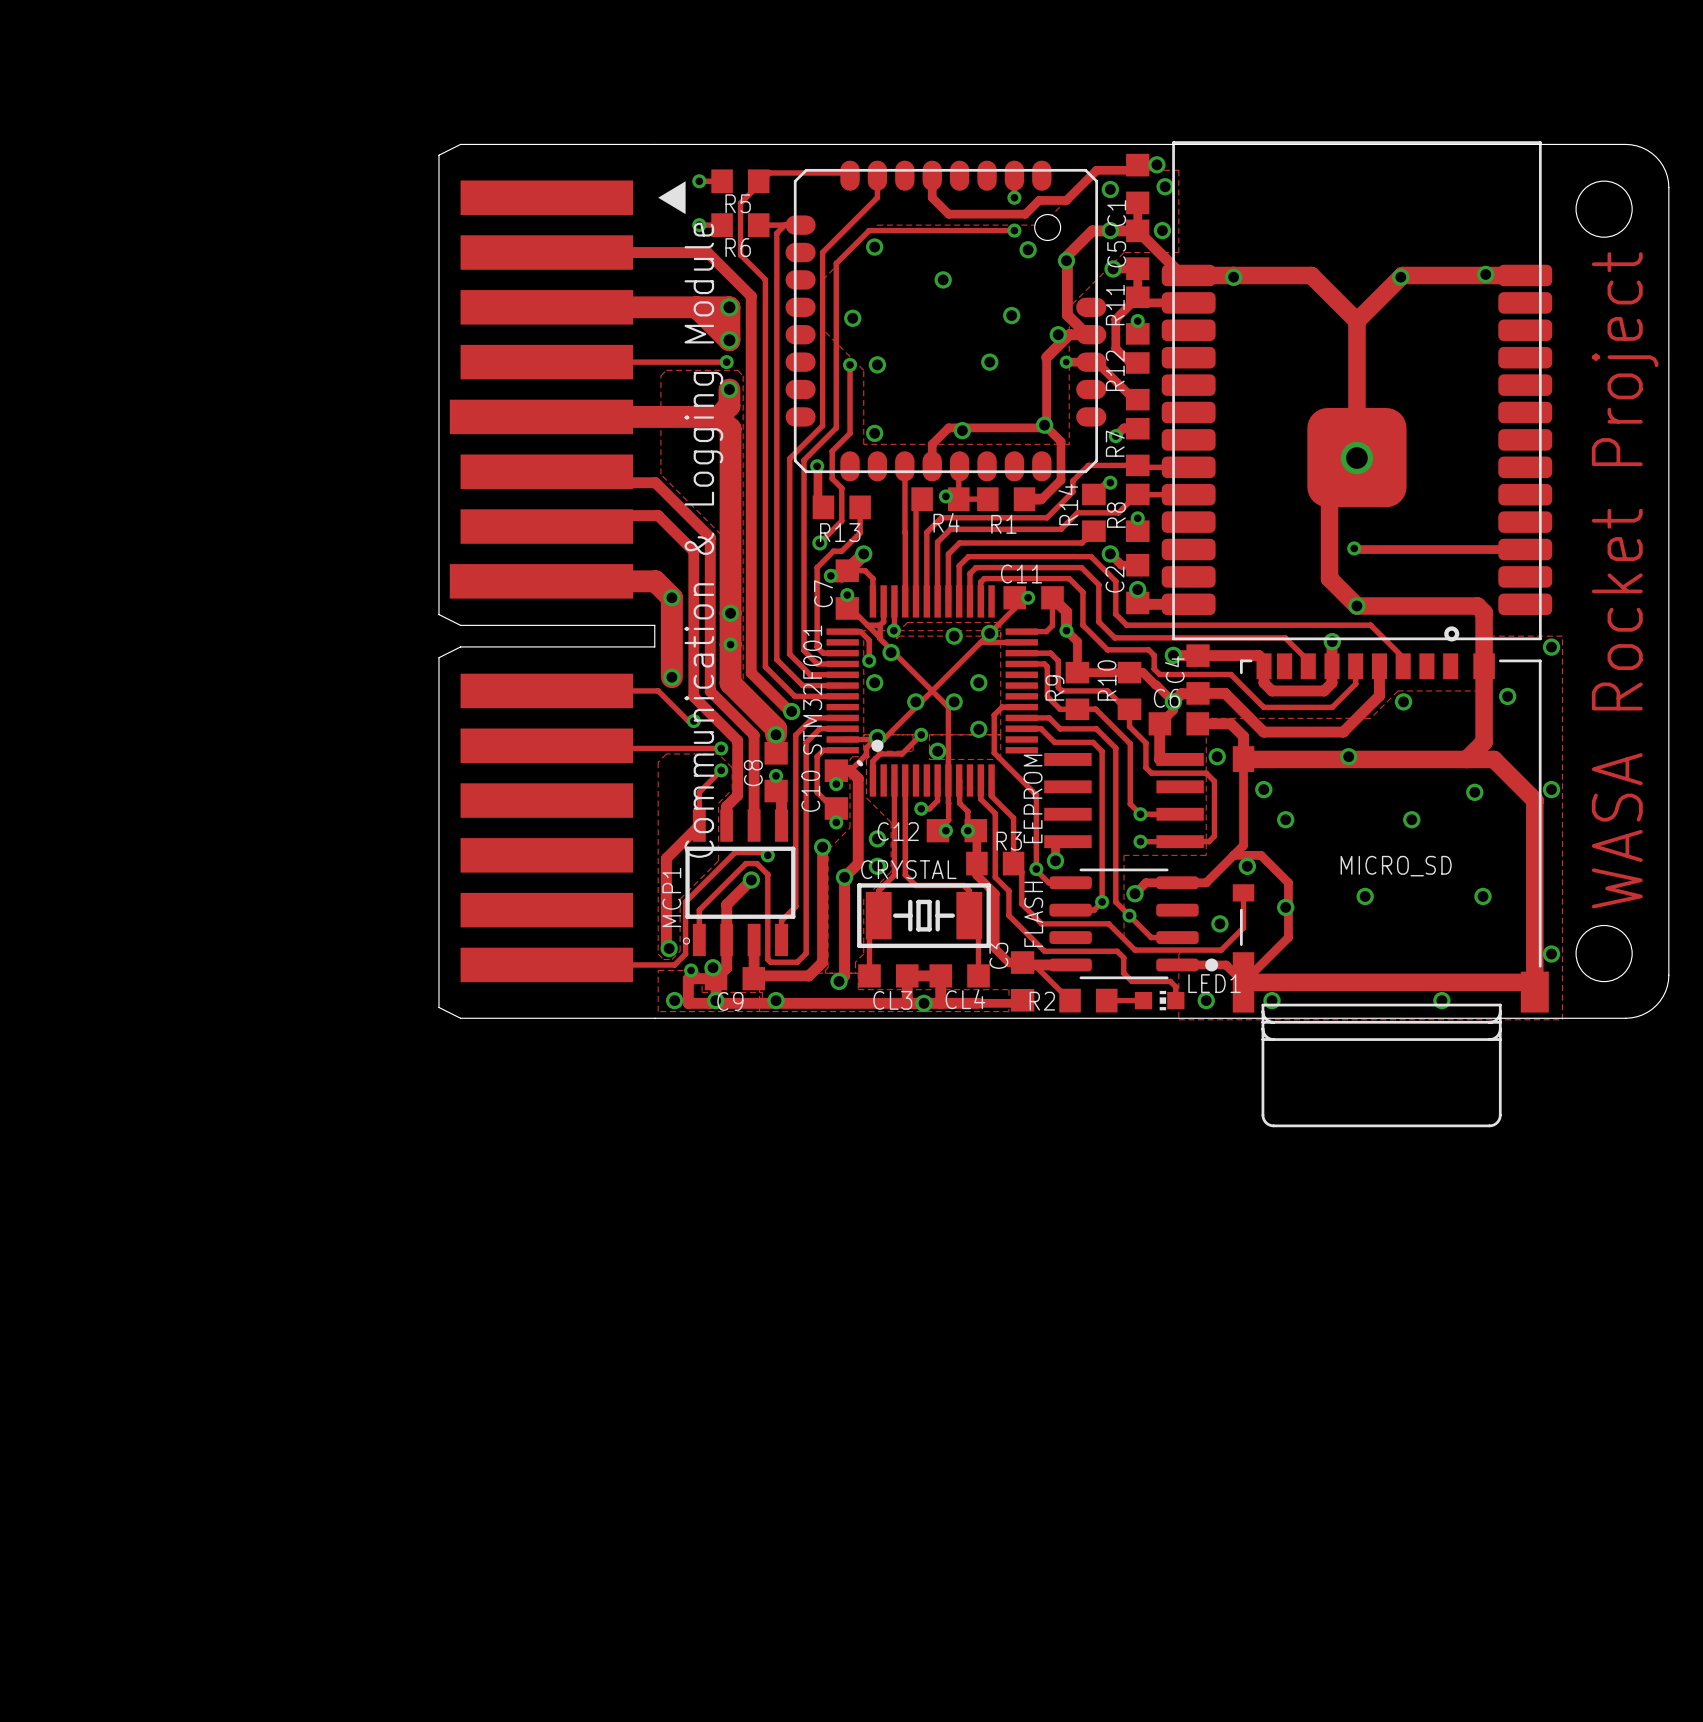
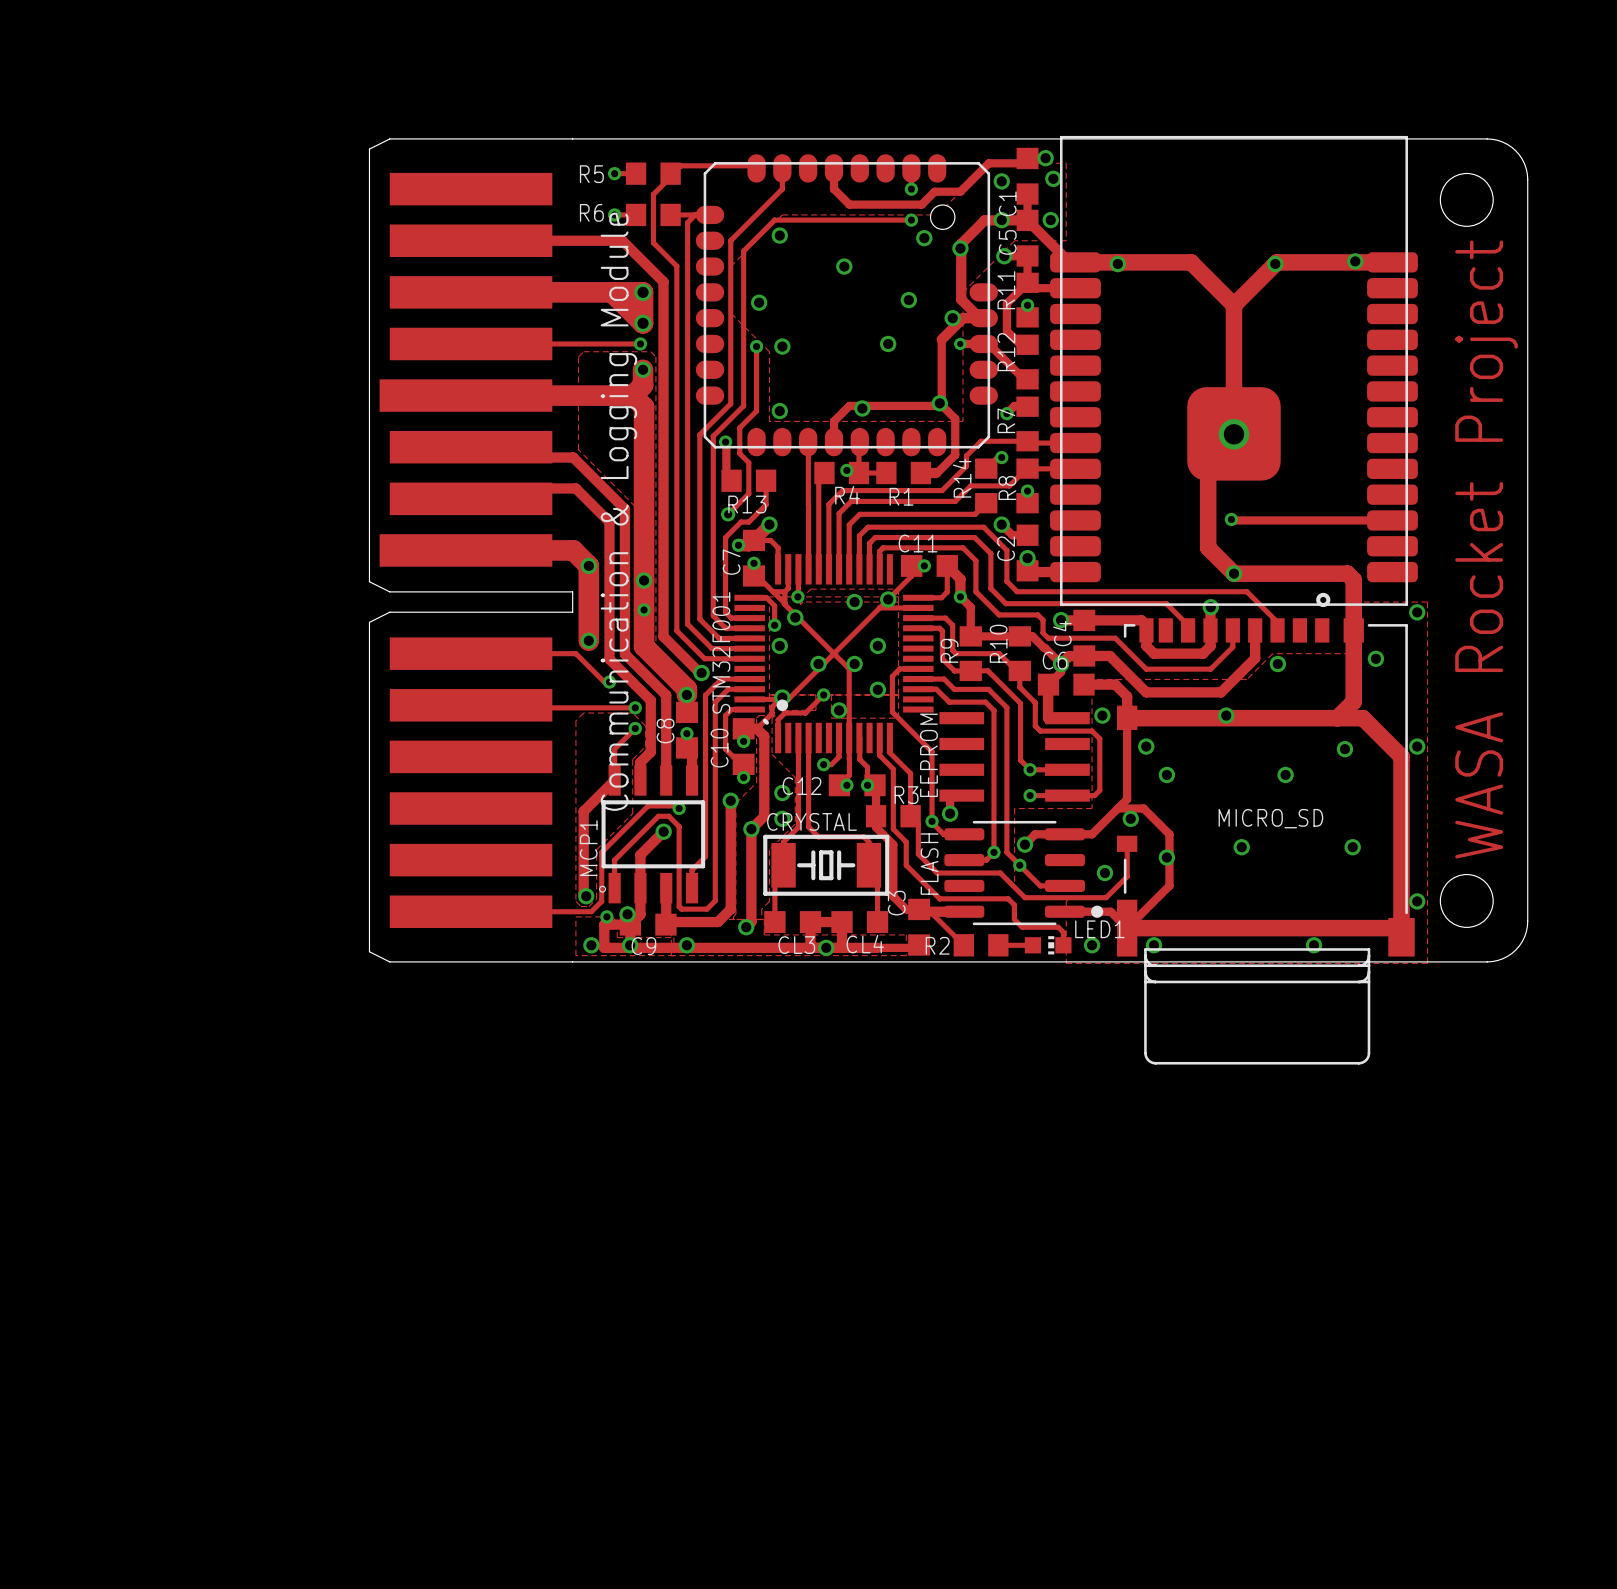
drawing: [658, 181, 686, 215] -> none
R5 name position: R5 (738, 203) -> R5 (591, 174)
R6 name position: R6 (738, 247) -> R6 (591, 212)

